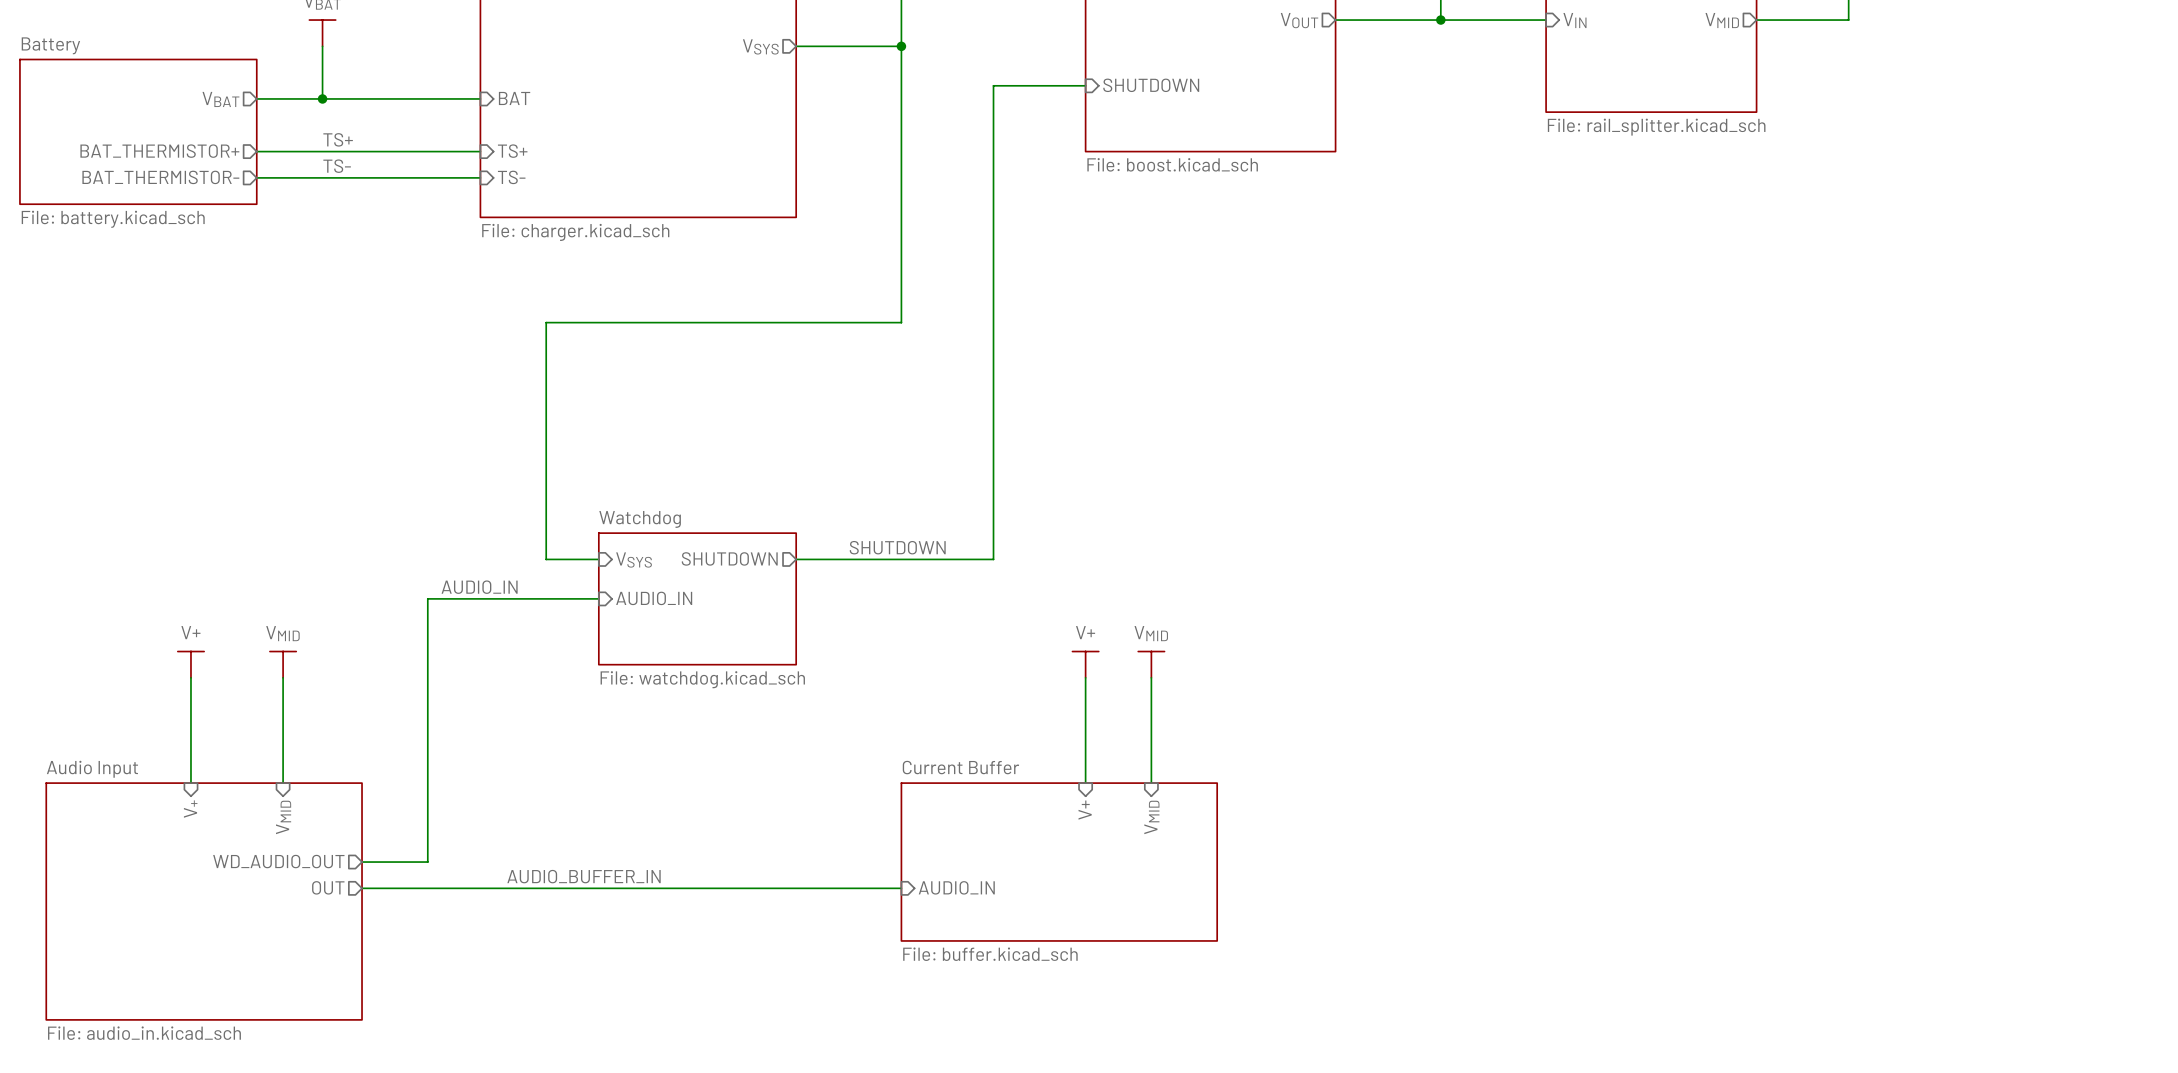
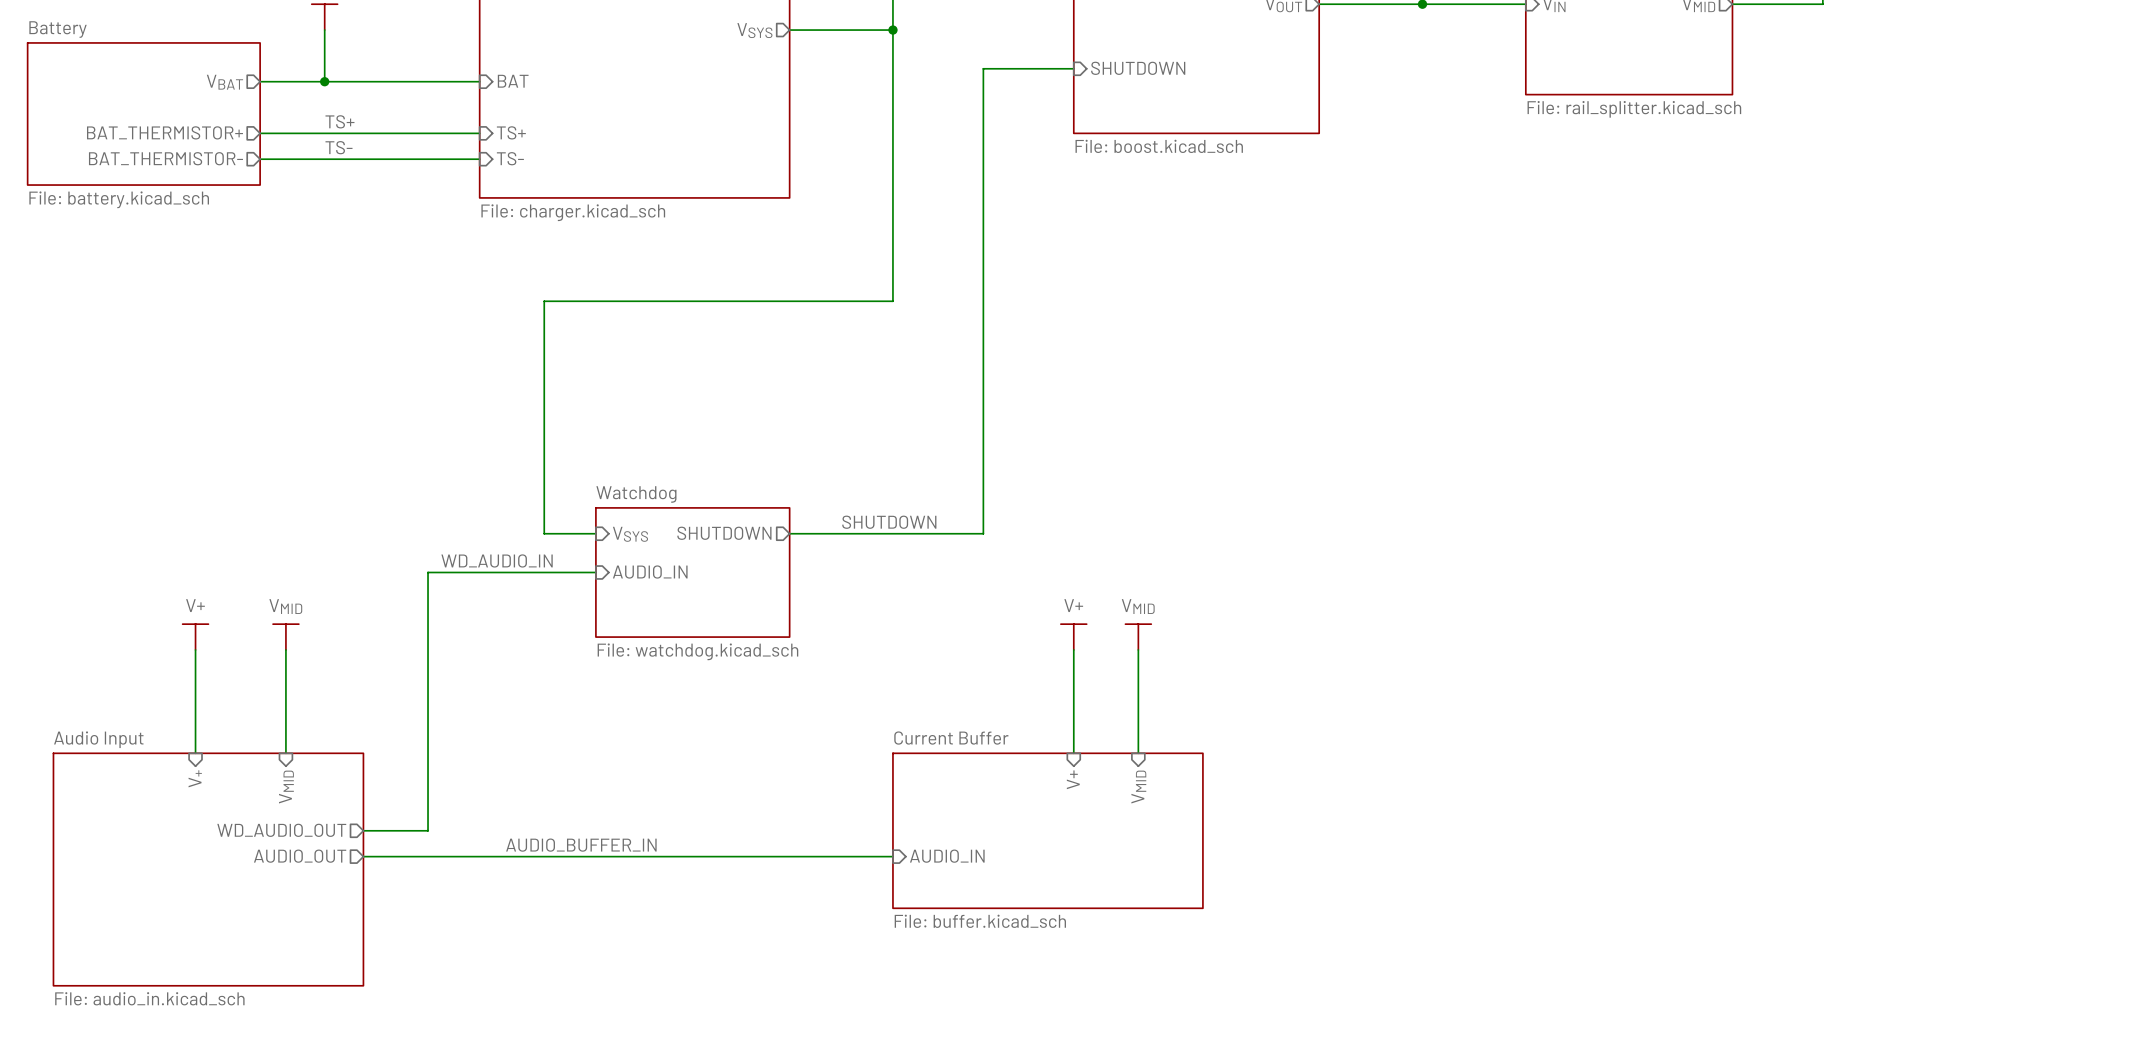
label: AUDIO_IN (479, 587) -> WD_AUDIO_IN (497, 560)
sheet pin: OUT (328, 887) -> AUDIO_OUT (300, 856)

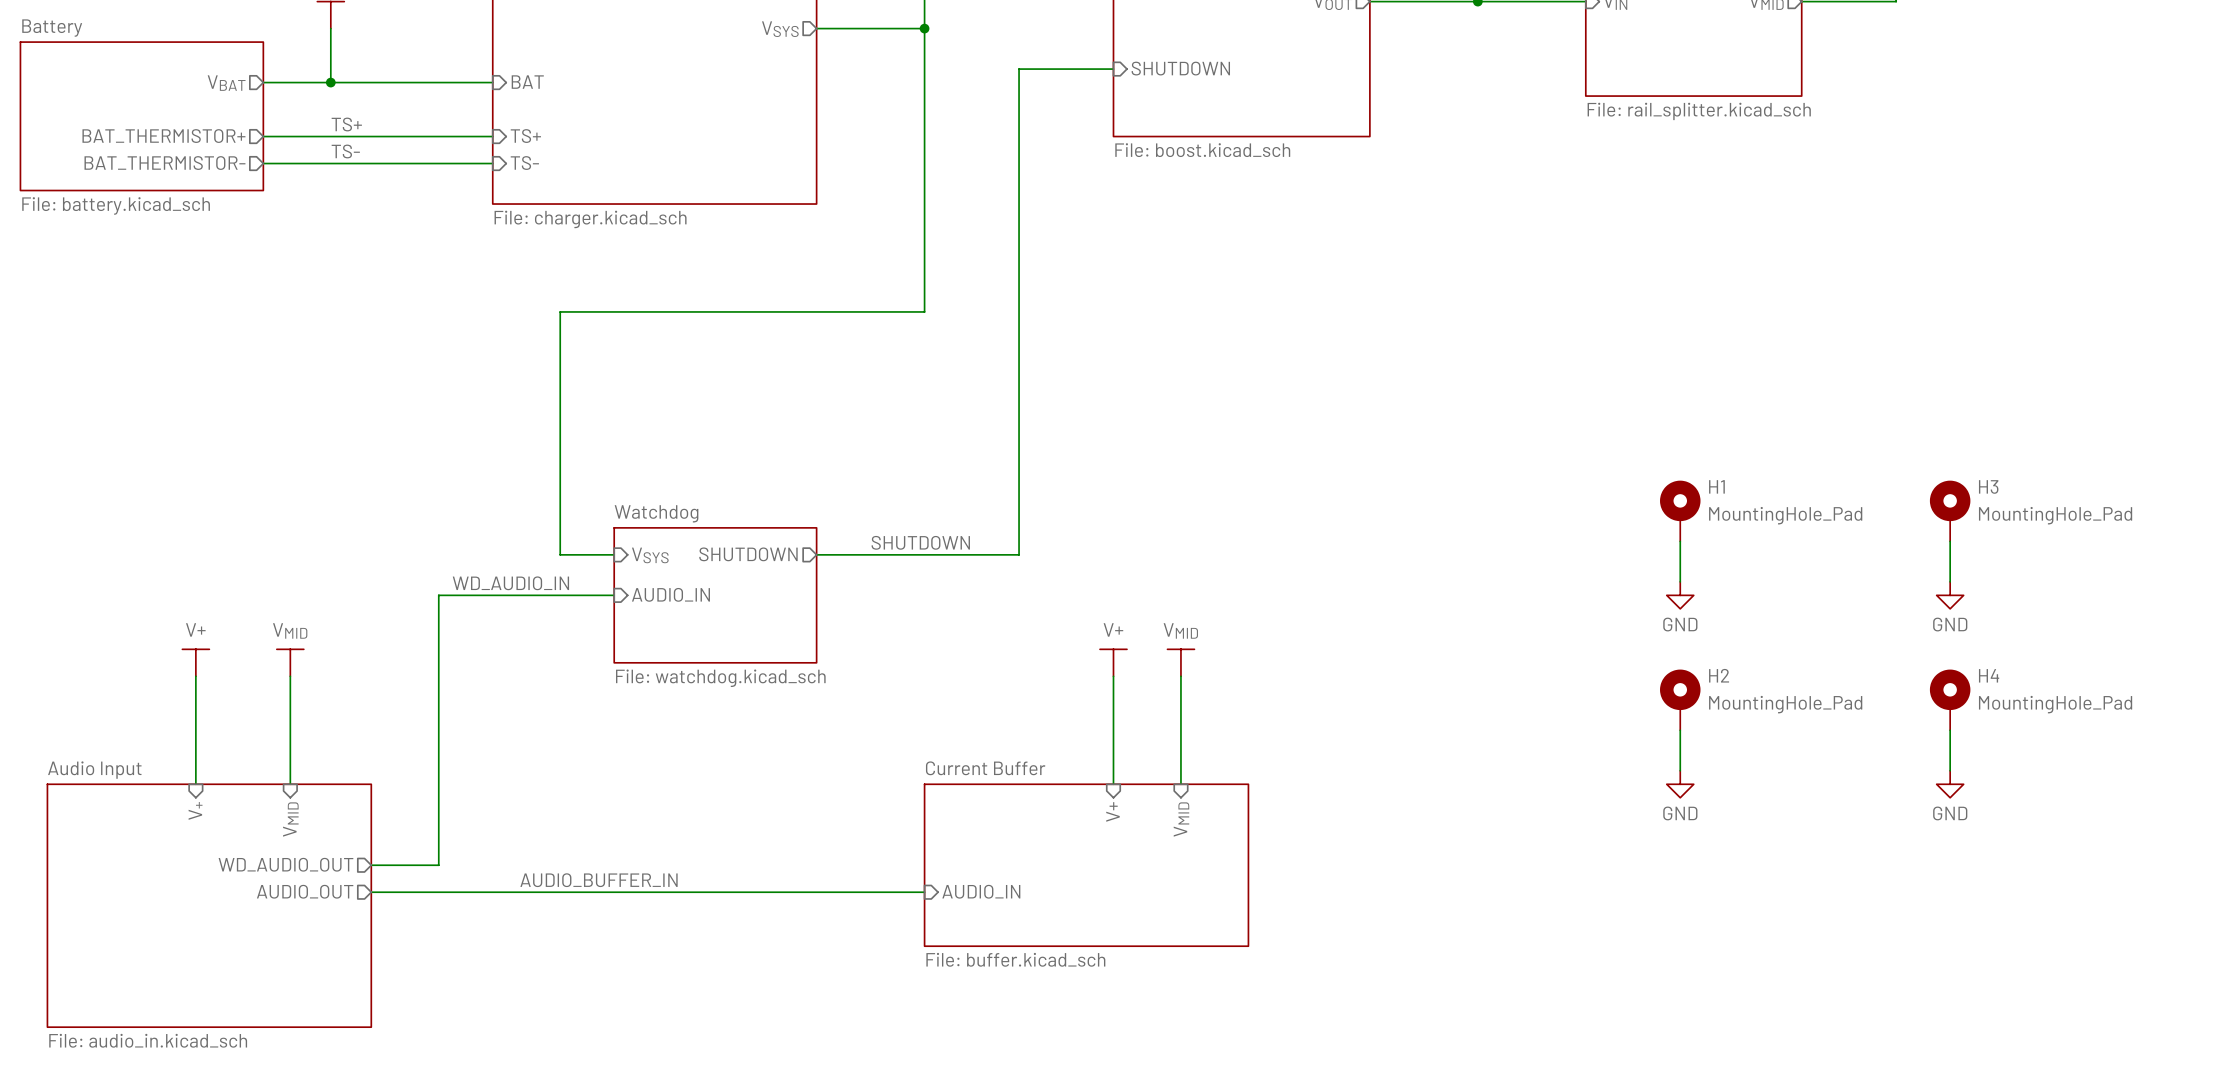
H1: none -> MountingHole_Pad (1680, 511)
H3: none -> MountingHole_Pad (1950, 511)
wire: none -> (1680, 541) (1680, 581)
wire: none -> (1950, 541) (1950, 581)
power symbol: none -> GND (1680, 595)
power symbol: none -> GND (1950, 595)
H2: none -> MountingHole_Pad (1680, 699)
H4: none -> MountingHole_Pad (1950, 699)
wire: none -> (1680, 730) (1680, 770)
wire: none -> (1950, 730) (1950, 770)
power symbol: none -> GND (1680, 784)
power symbol: none -> GND (1950, 784)

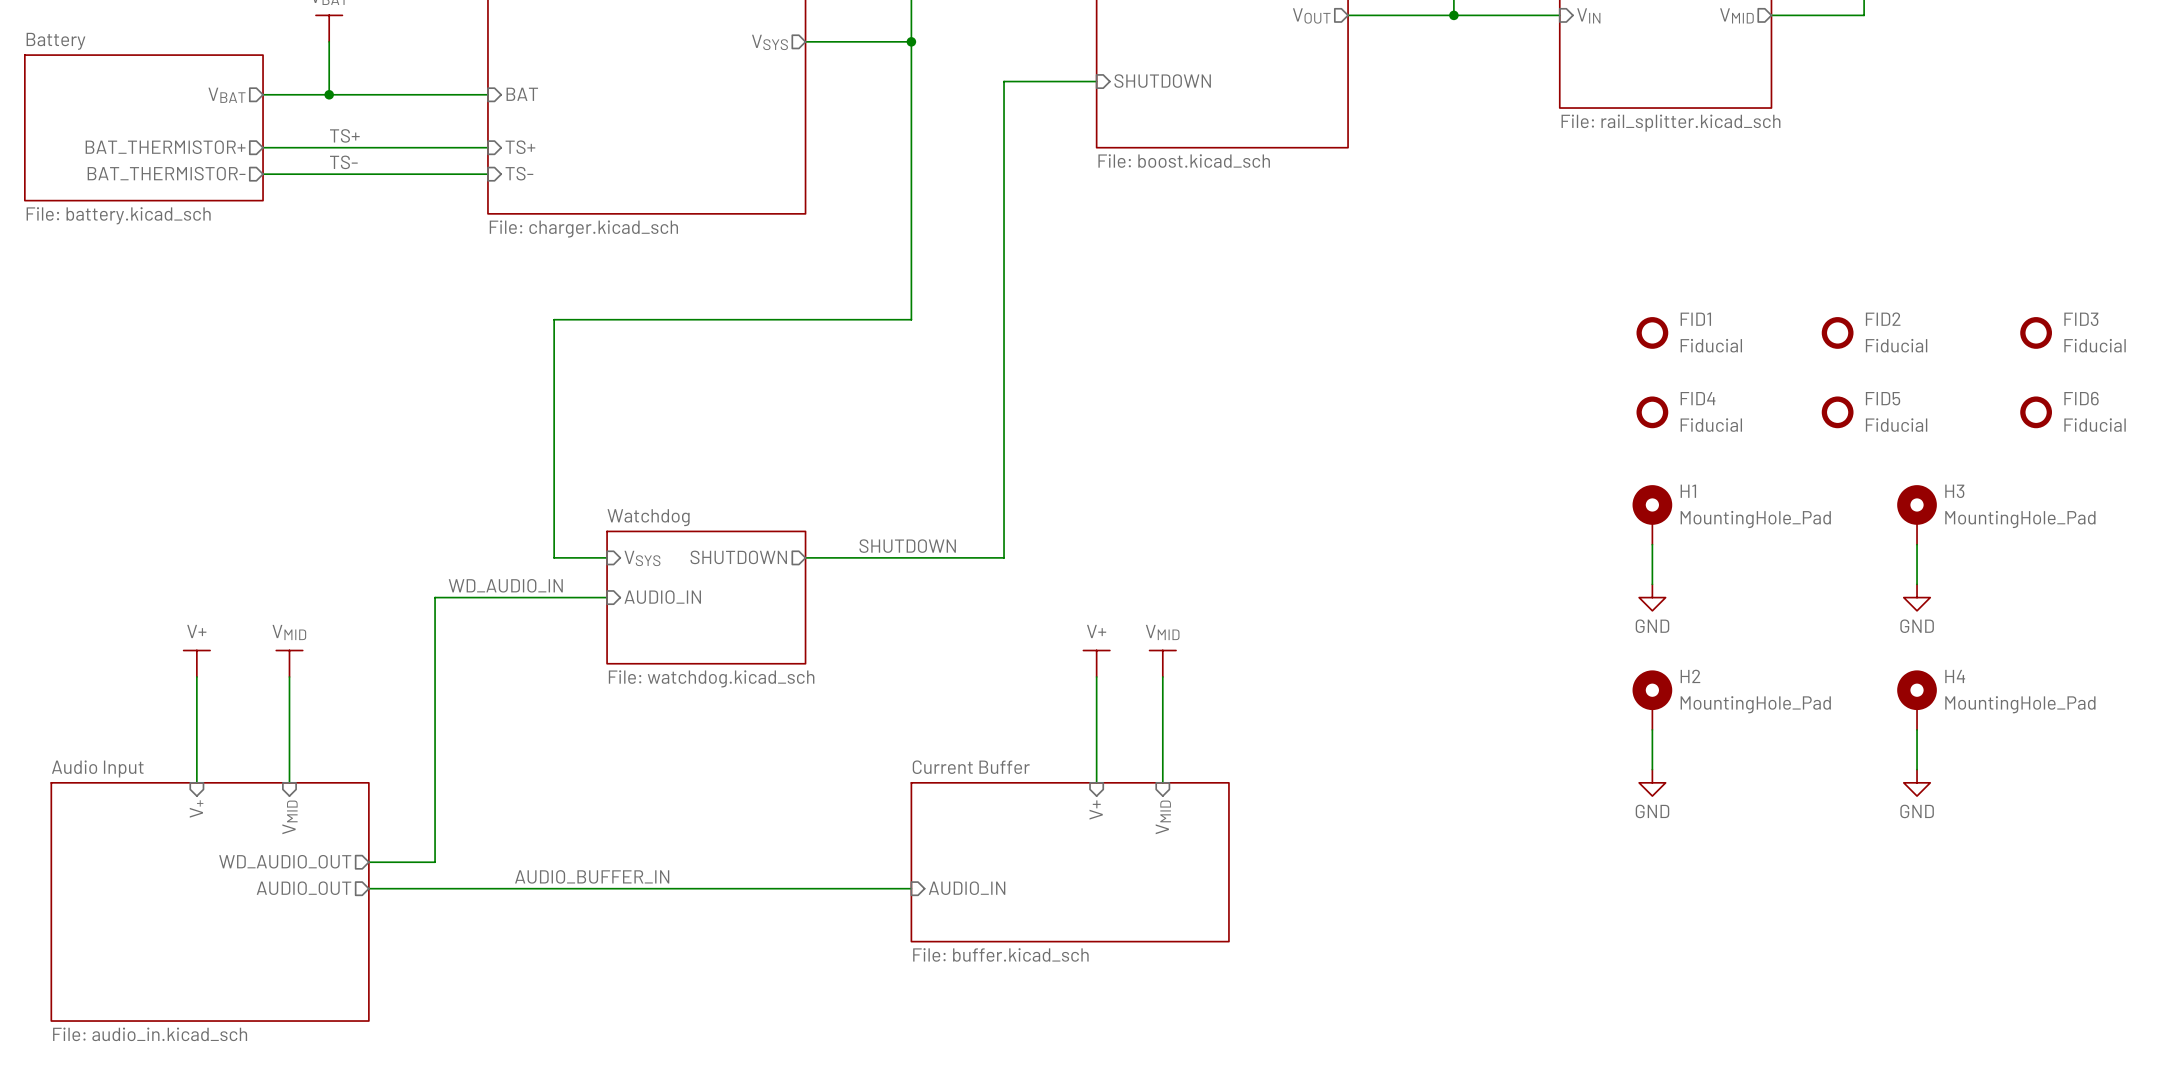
FID1: none -> Fiducial (1652, 332)
FID2: none -> Fiducial (1837, 332)
FID3: none -> Fiducial (2036, 332)
FID4: none -> Fiducial (1652, 412)
FID5: none -> Fiducial (1837, 412)
FID6: none -> Fiducial (2036, 412)

